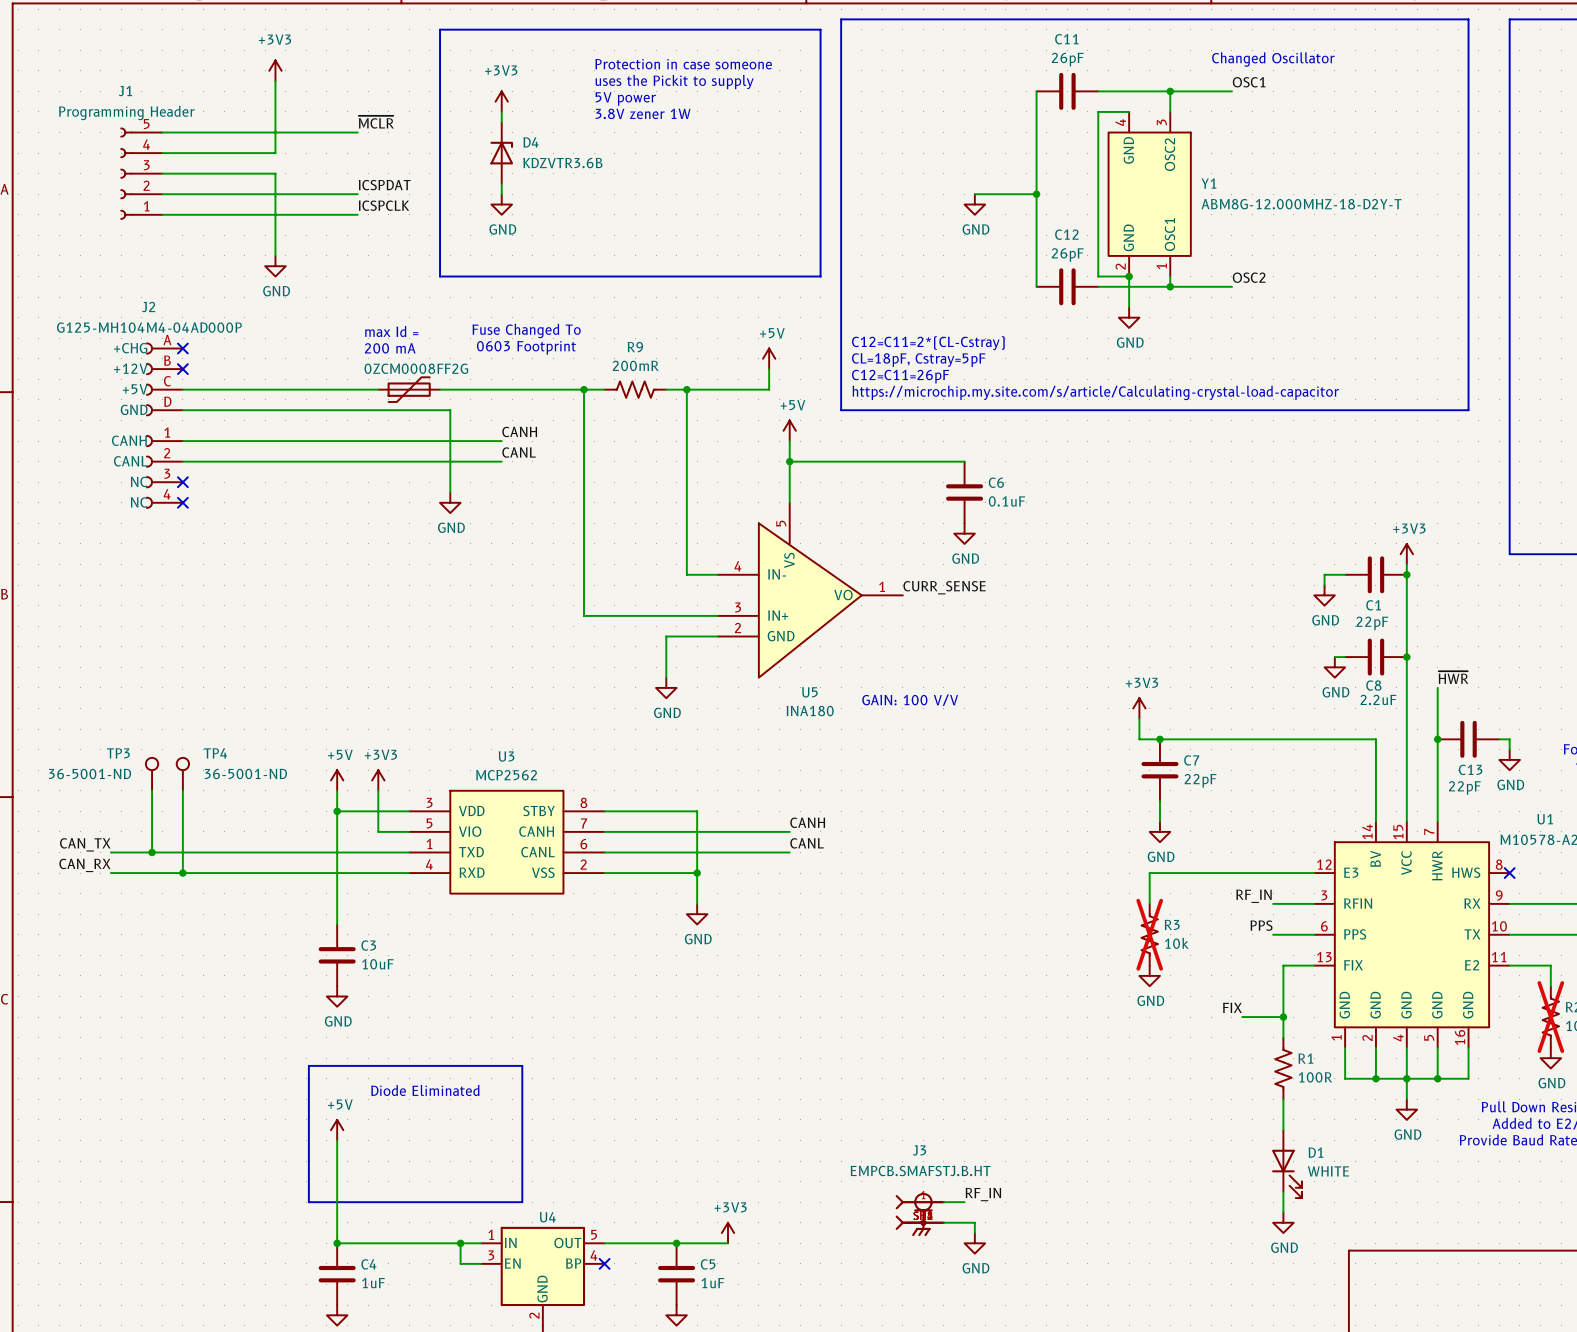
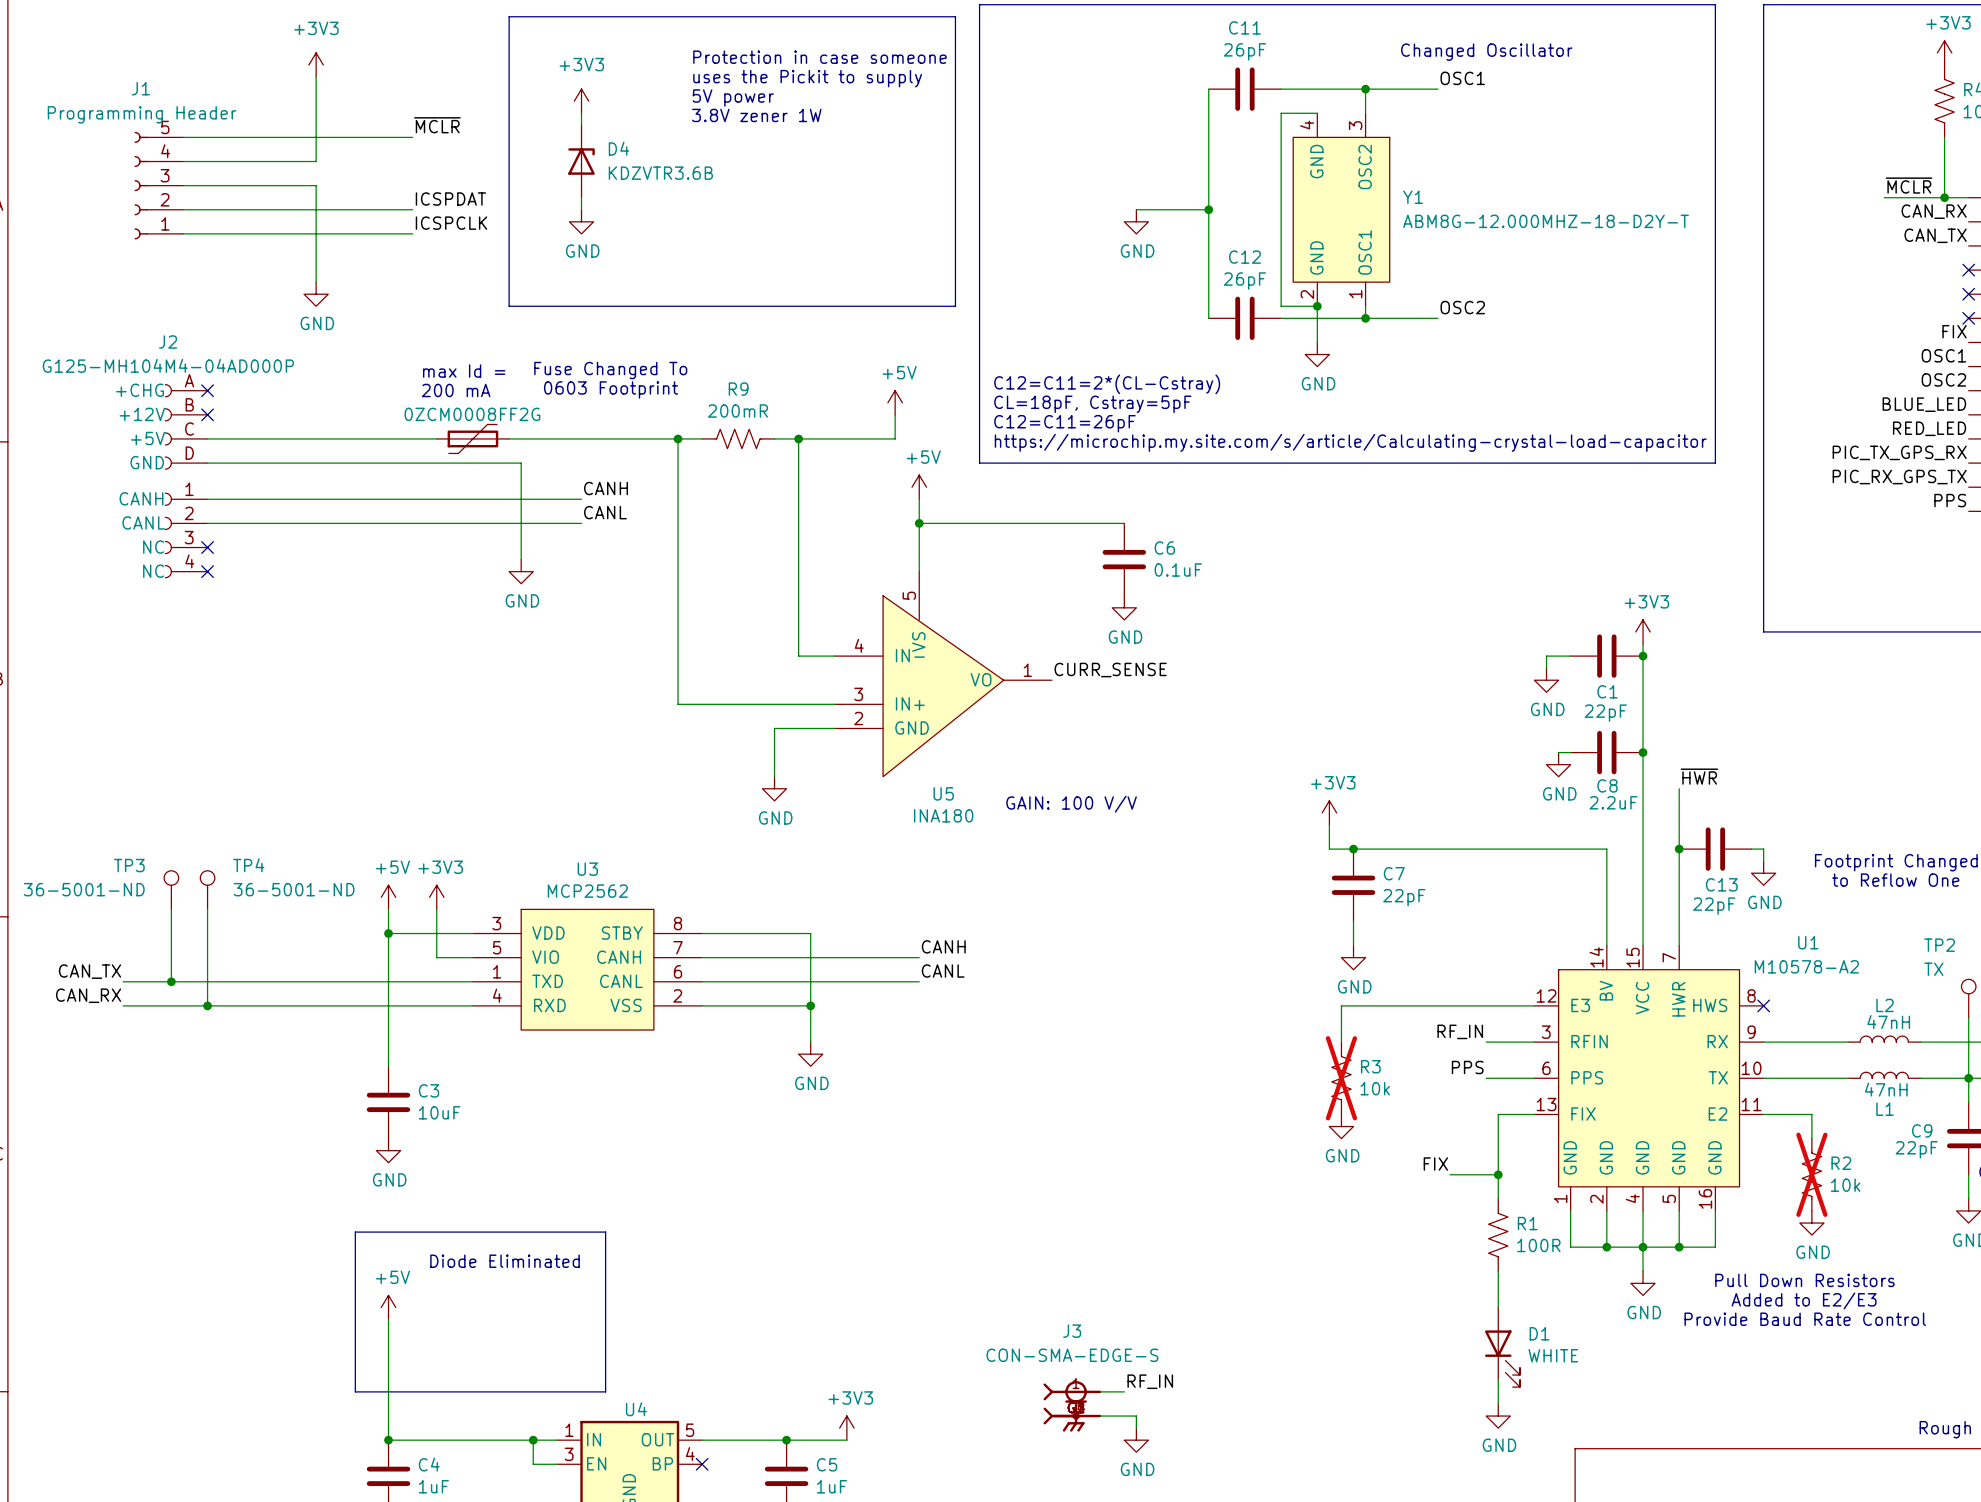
J3 value: EMPCB.SMAFSTJ.B.HT (920, 1170) -> CON-SMA-EDGE-S (1072, 1355)
J3 symbol: [895, 1192, 946, 1237] -> [1043, 1381, 1102, 1432]

